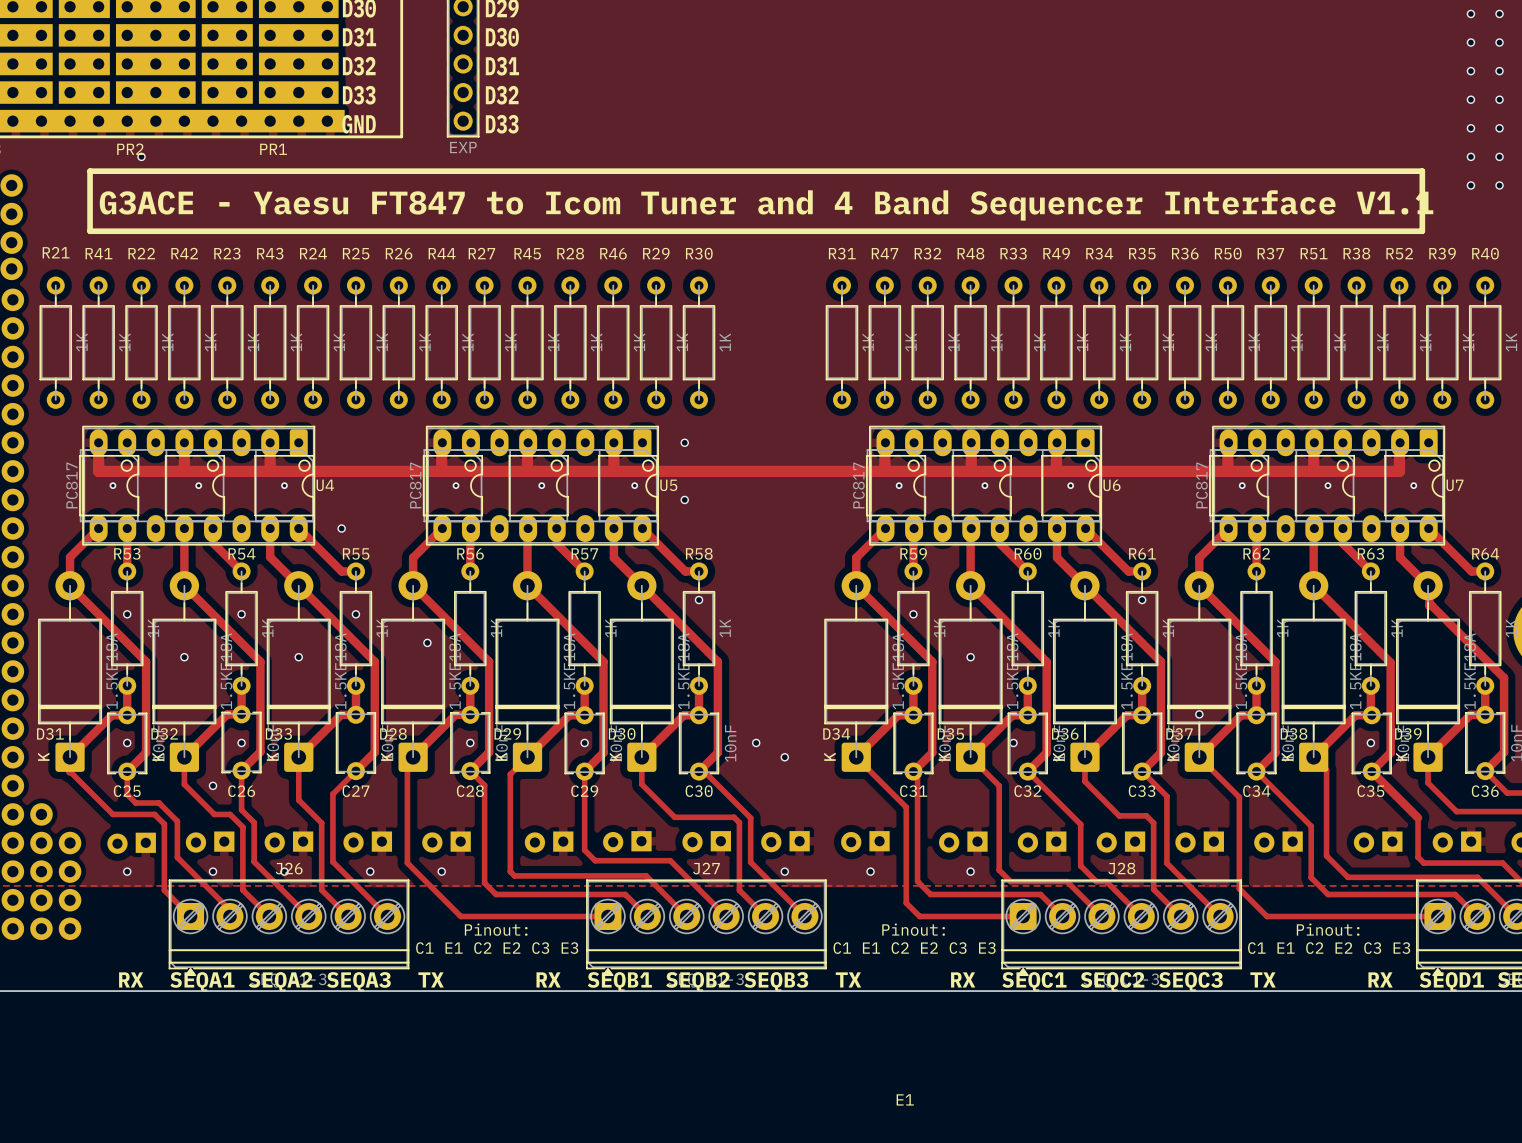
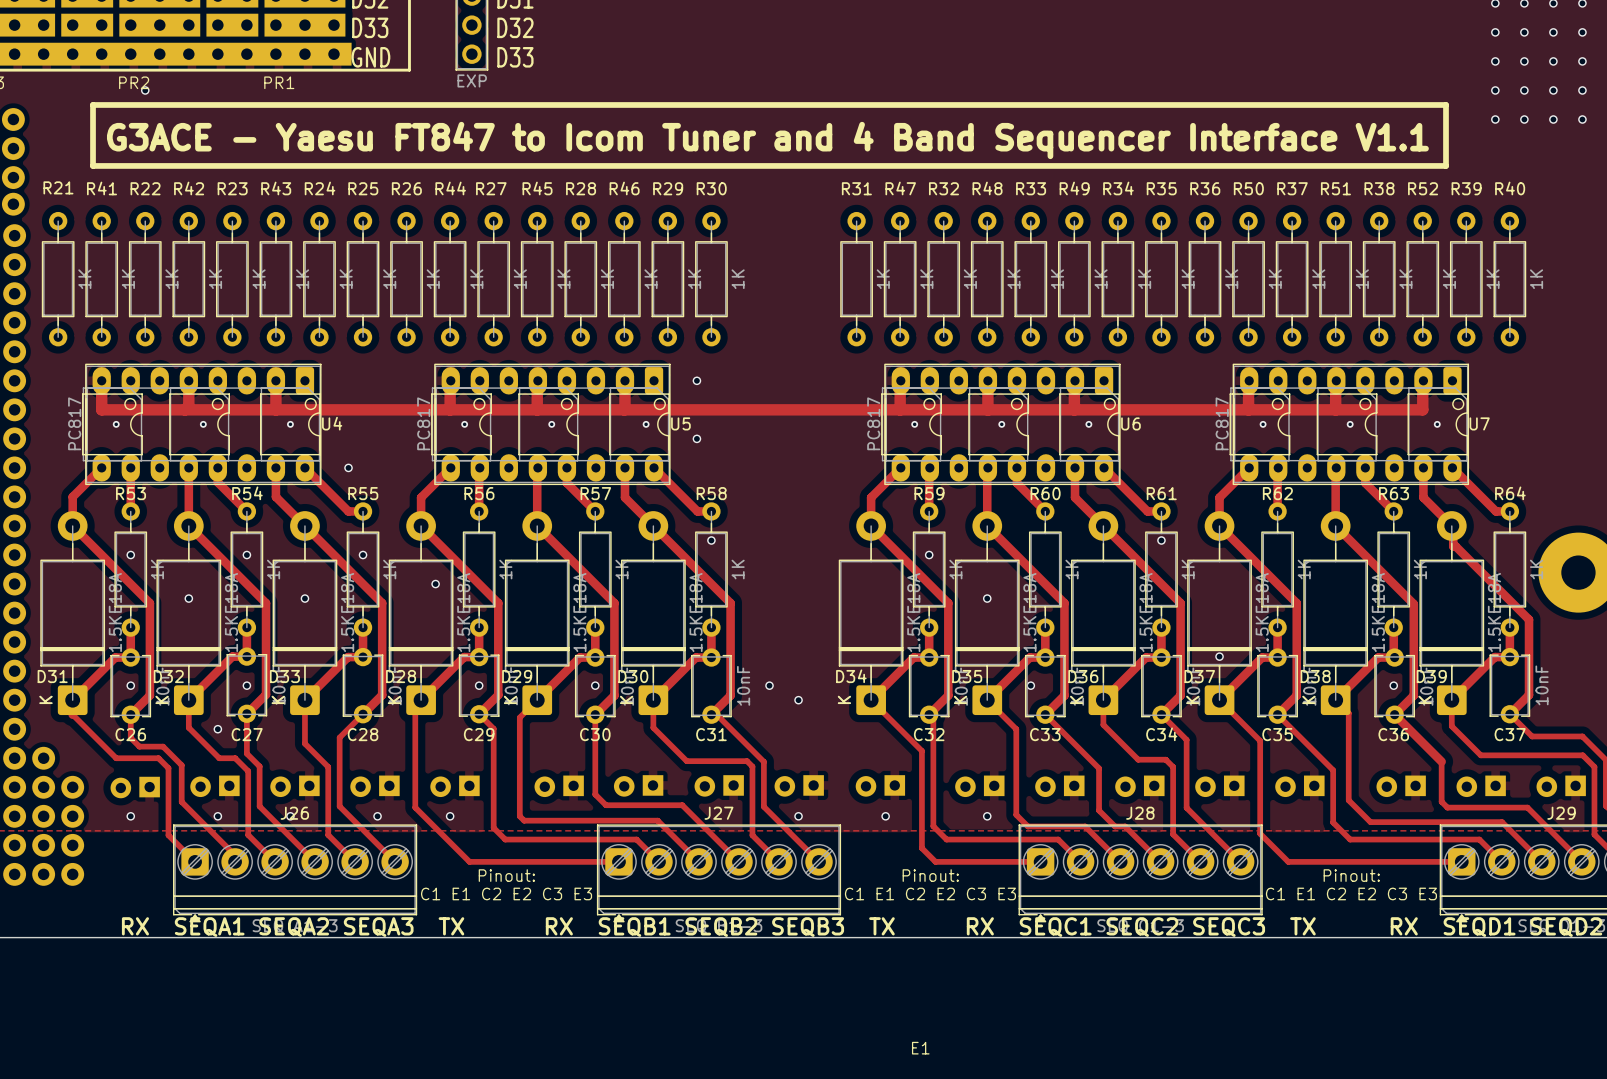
C25 name: C25 (127, 791) -> C26 (130, 734)
C26 name: C26 (241, 791) -> C27 (247, 734)
C27 name: C27 (355, 791) -> C28 (363, 734)
C28 name: C28 (470, 791) -> C29 (479, 734)
C29 name: C29 (584, 791) -> C30 (595, 734)
C30 name: C30 (699, 791) -> C31 (711, 734)
C31 name: C31 (913, 791) -> C32 (929, 734)
C32 name: C32 (1027, 791) -> C33 (1045, 734)
C33 name: C33 (1142, 791) -> C34 (1161, 734)
C34 name: C34 (1256, 791) -> C35 (1277, 734)
C35 name: C35 (1370, 791) -> C36 (1393, 734)
C36 name: C36 (1485, 791) -> C37 (1510, 734)

